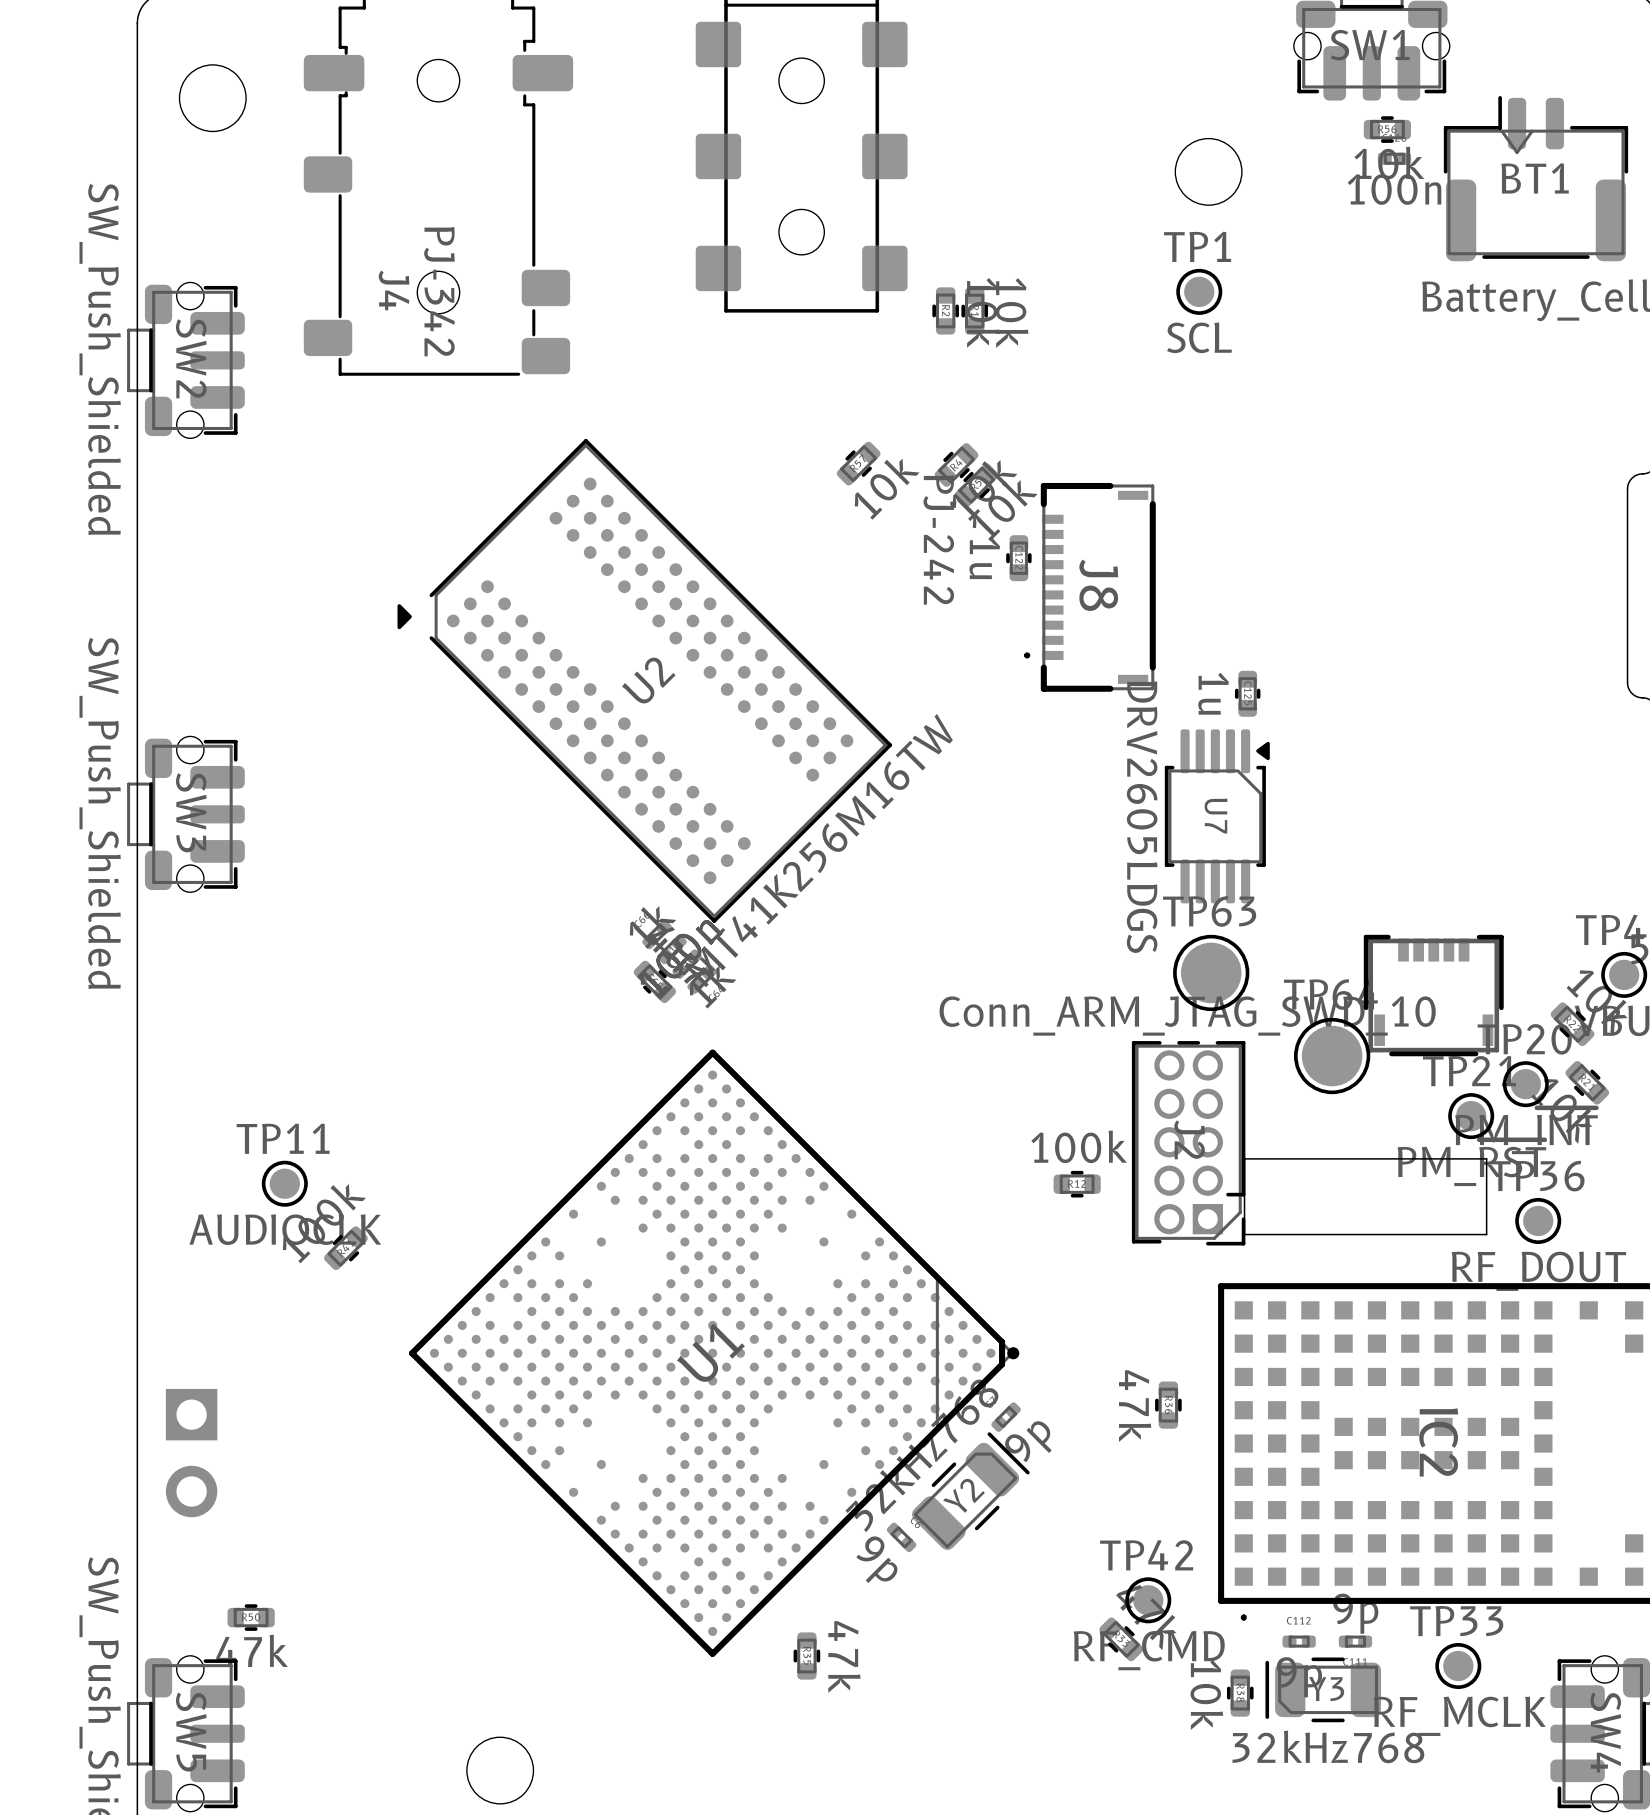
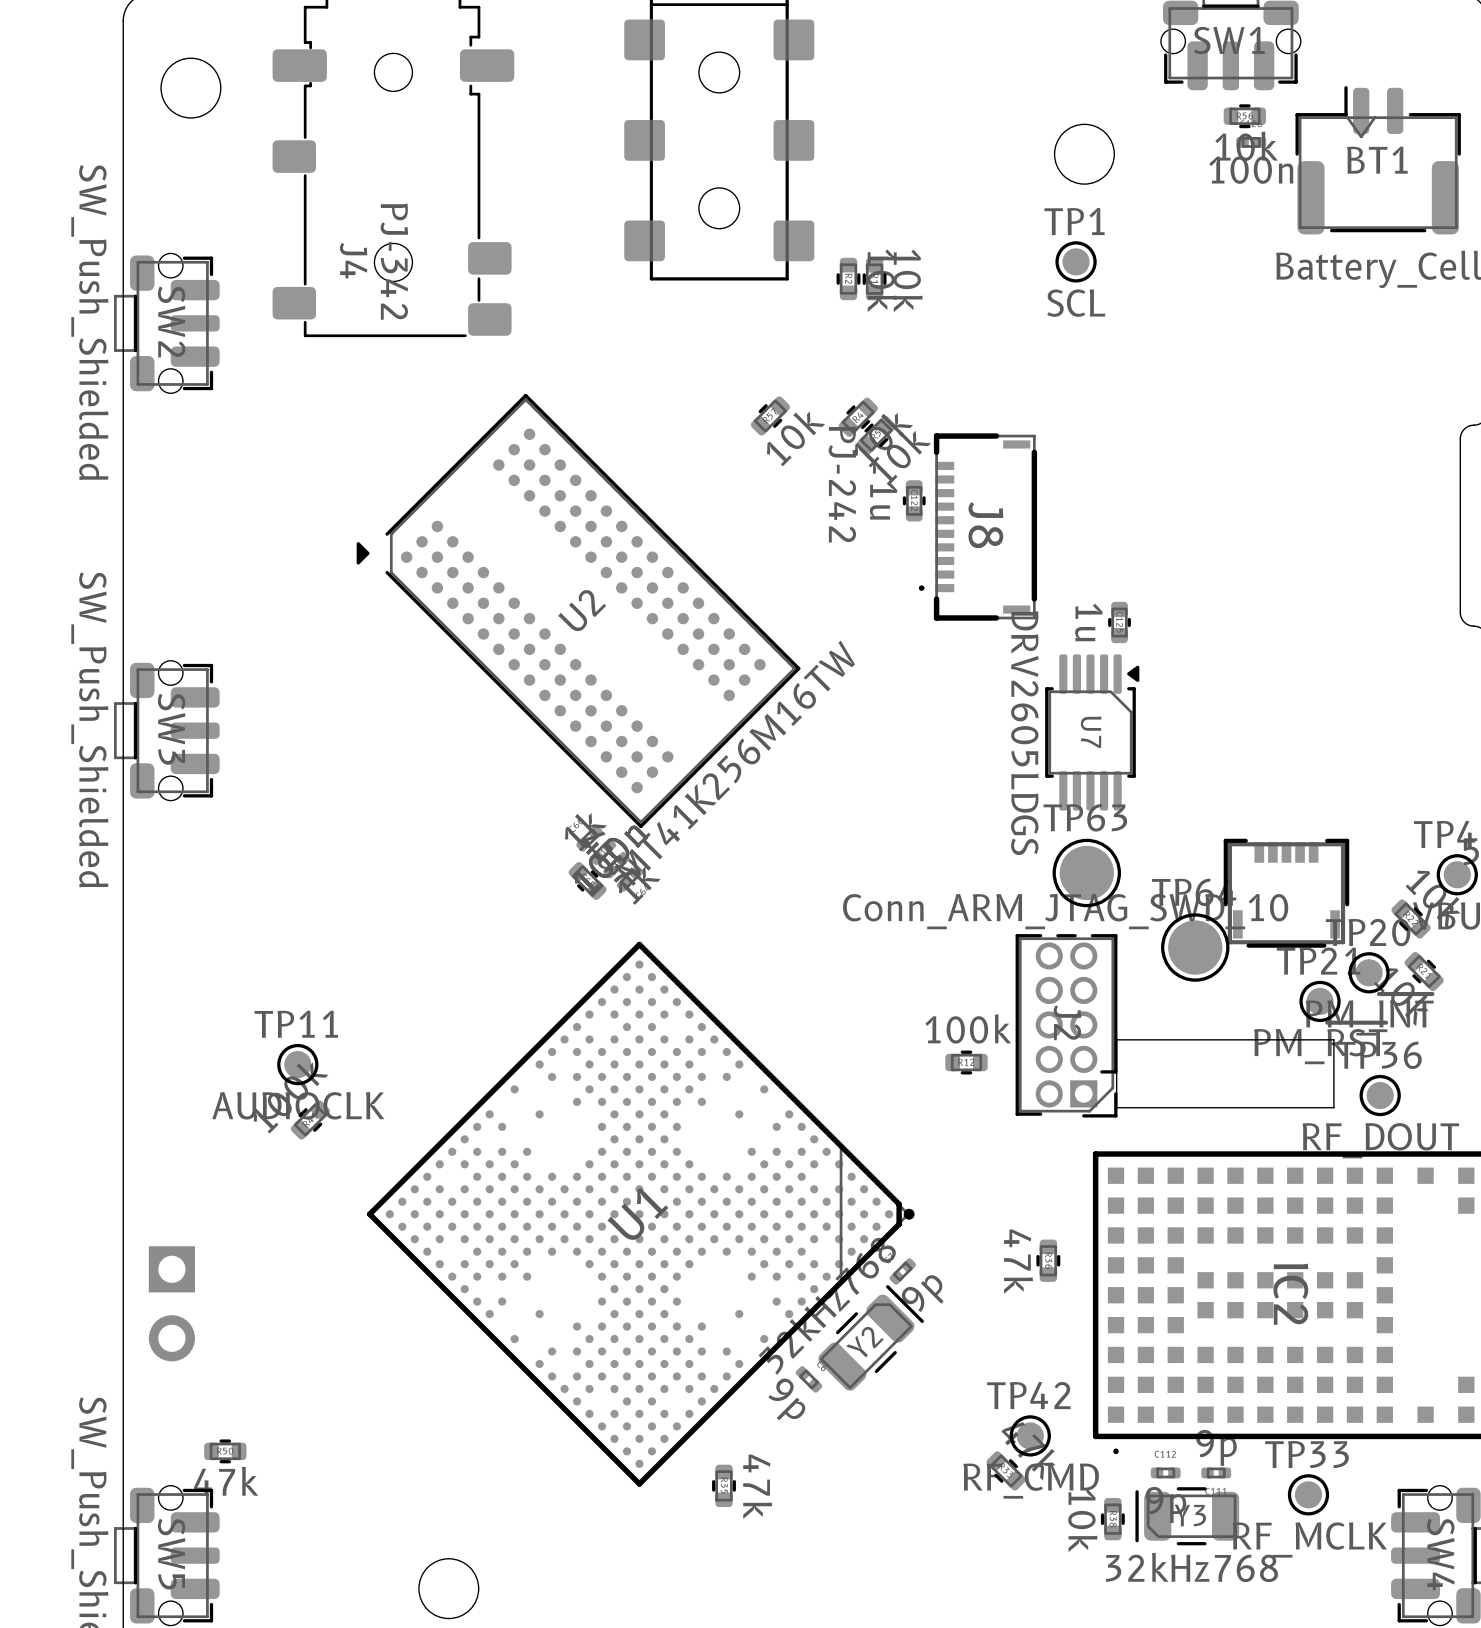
TP11 position: (284, 1183) -> (297, 1064)

